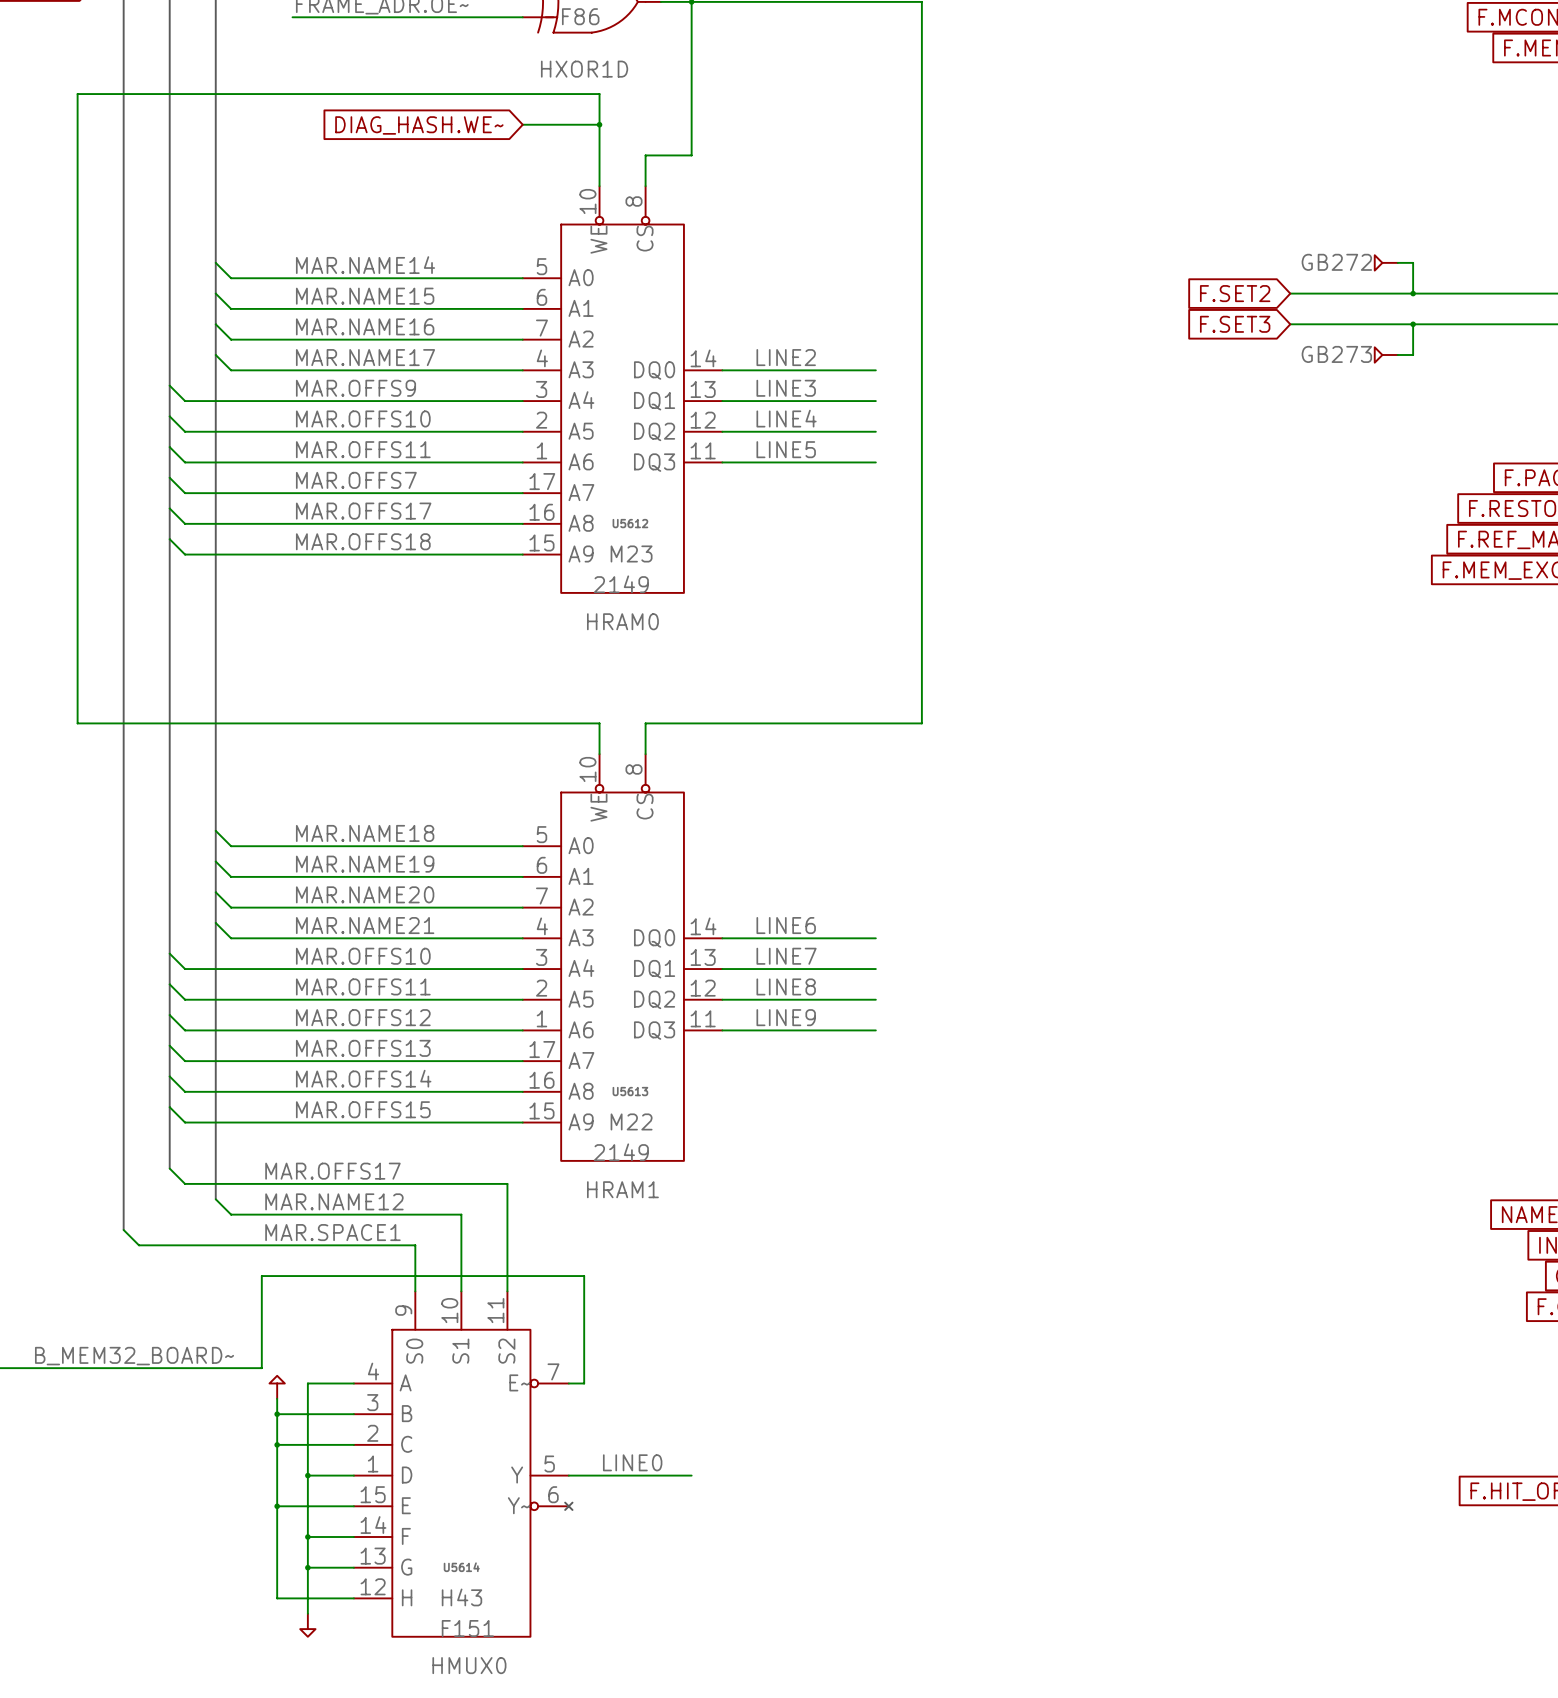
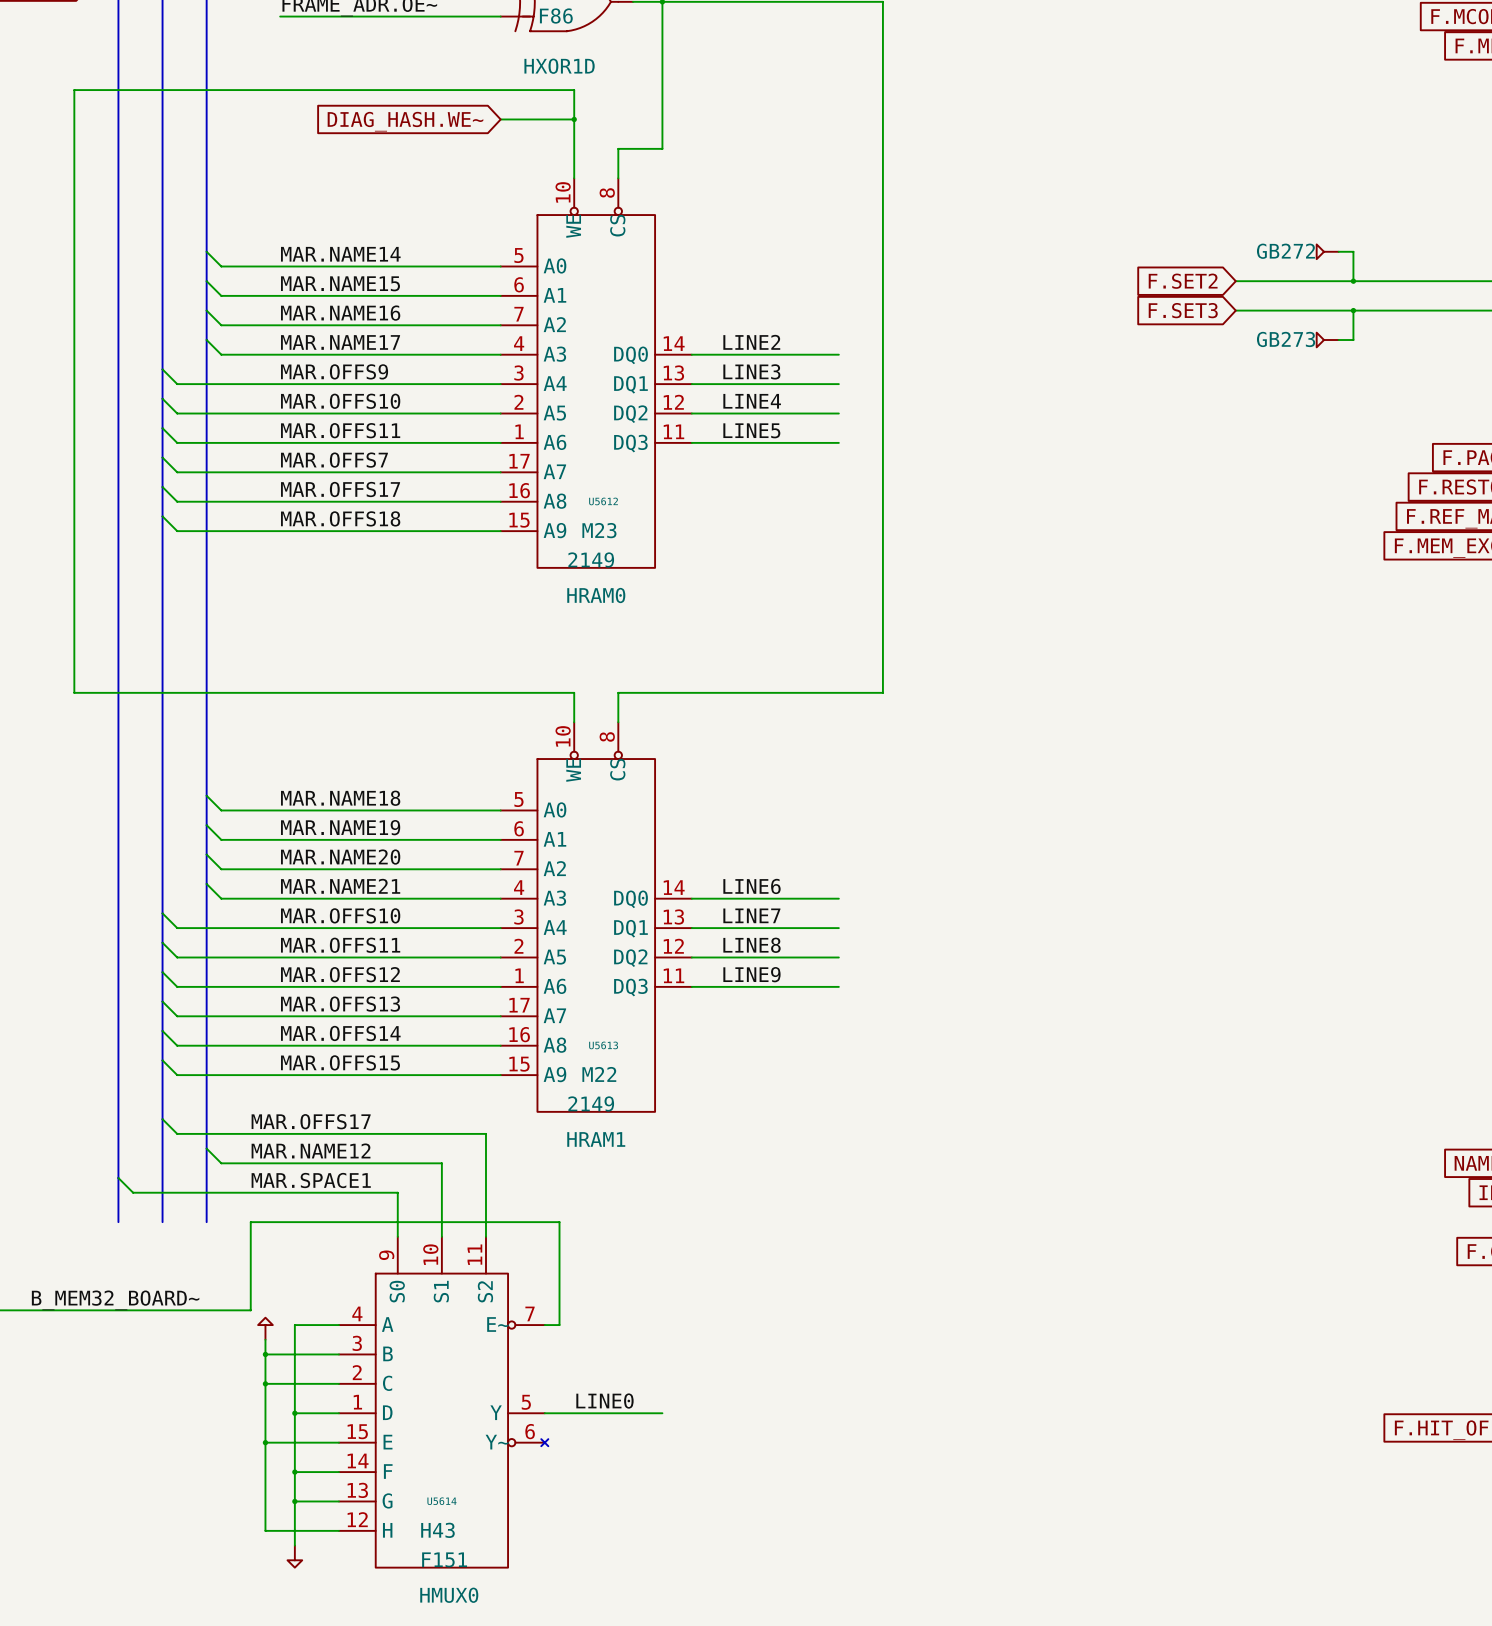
bus: none -> (162, 1119) (162, 1222)
bus: none -> (206, 1148) (206, 1222)
bus: none -> (118, 1178) (118, 1222)

